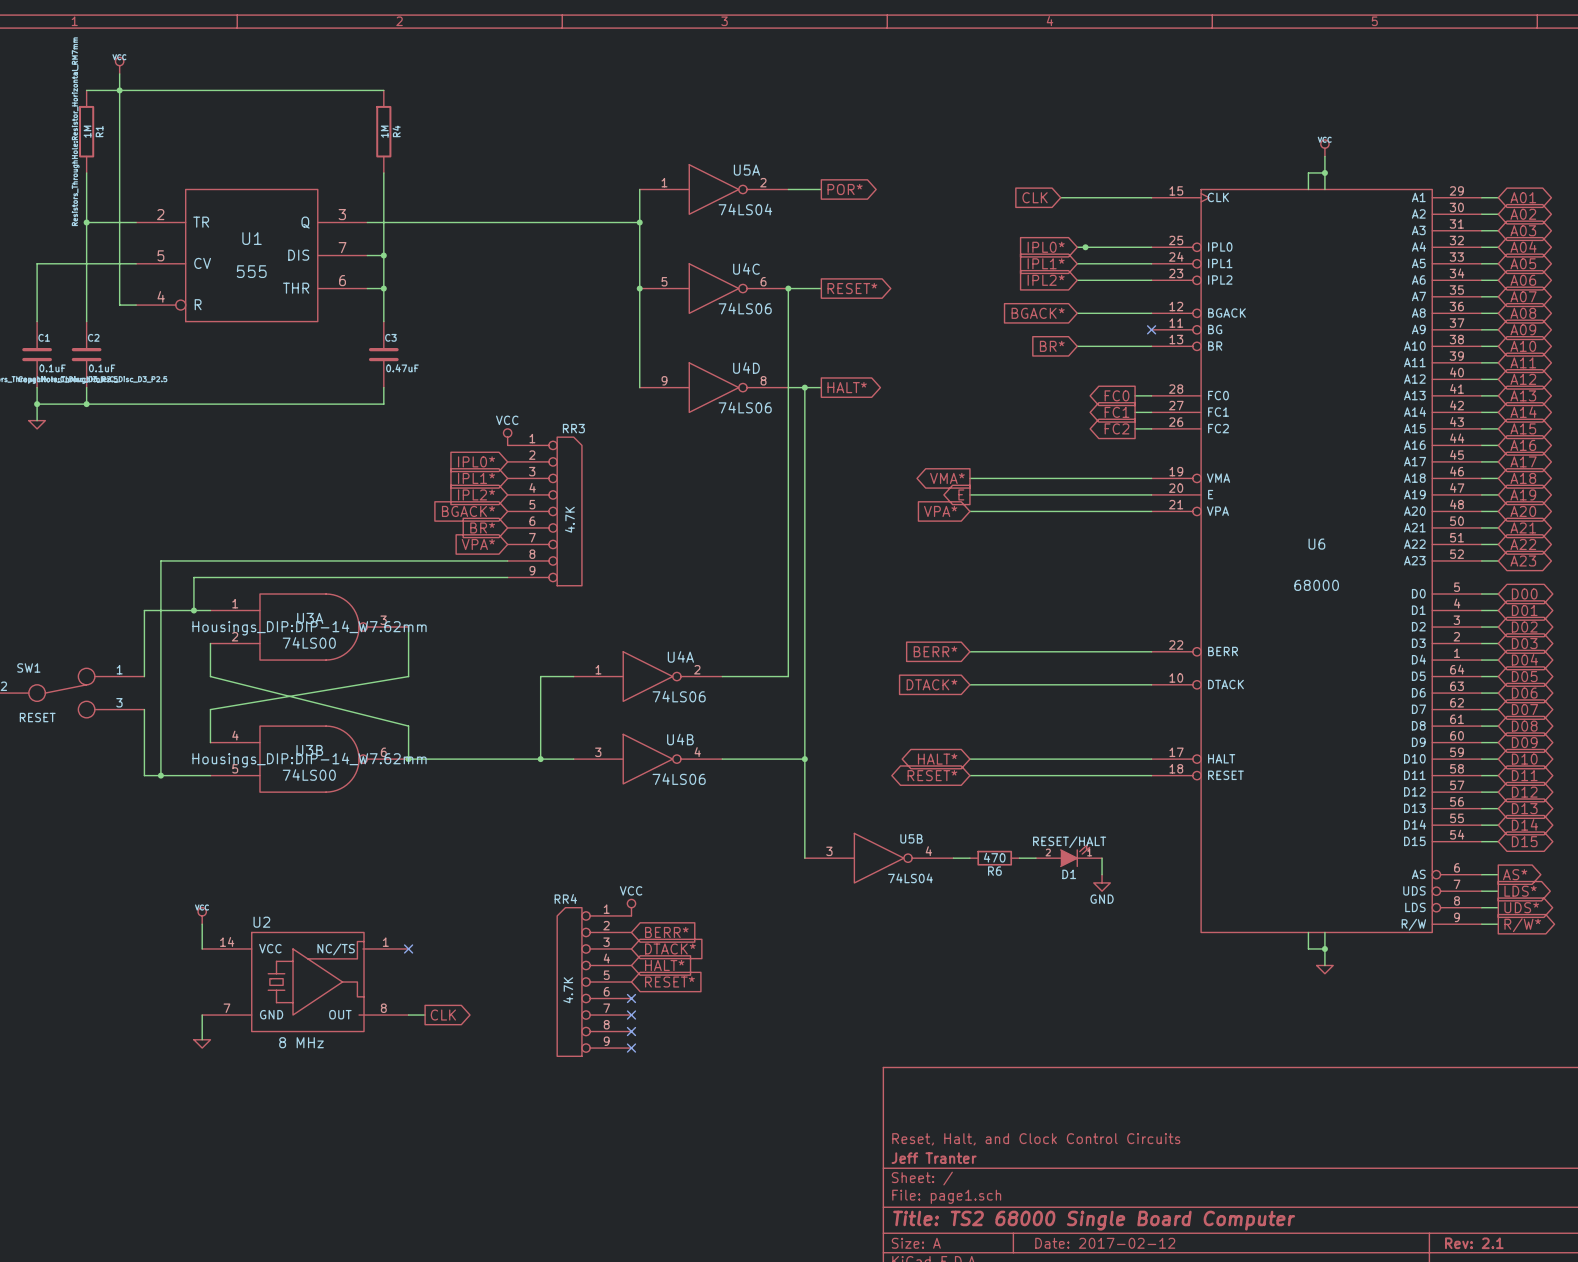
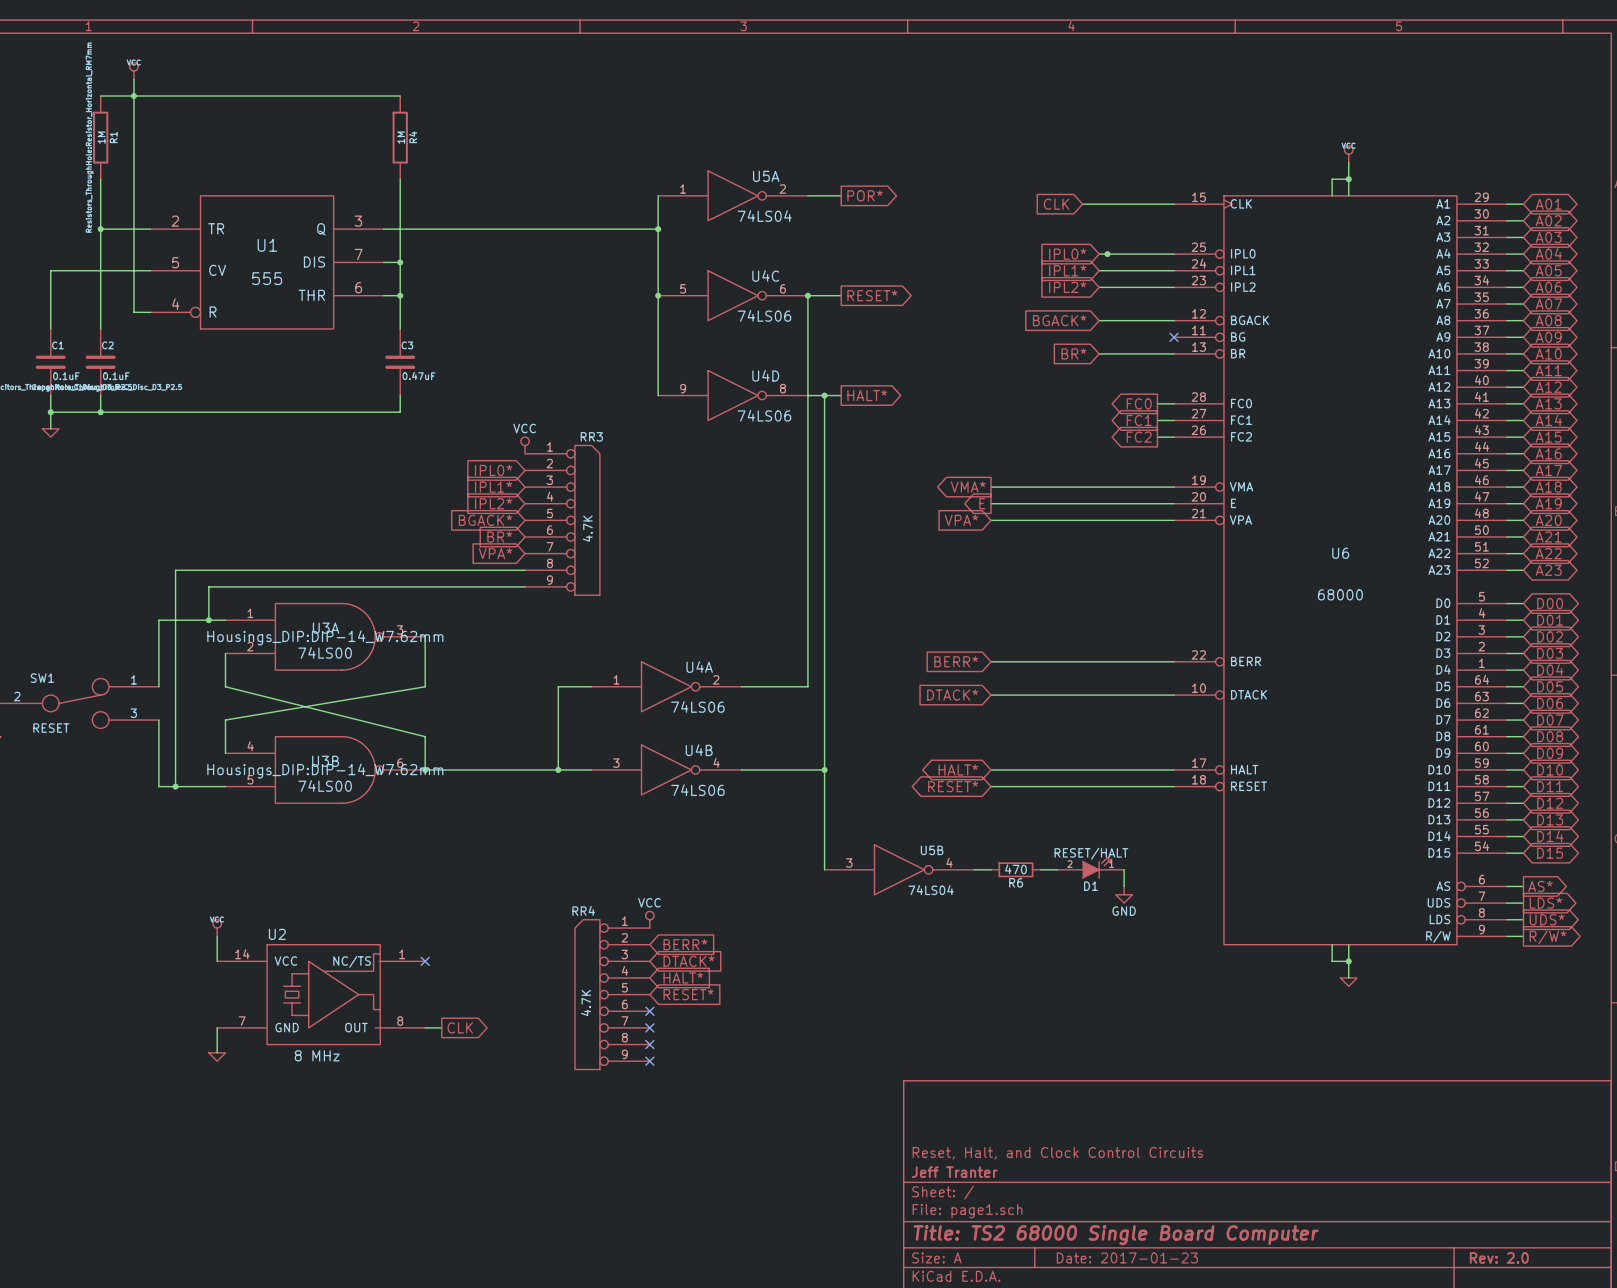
title block: Date: 2017-02-12 (1105, 1243) -> Date: 2017-01-23 (1127, 1257)
title block: Rev: 2.1 (1474, 1243) -> Rev: 2.0 (1499, 1257)

